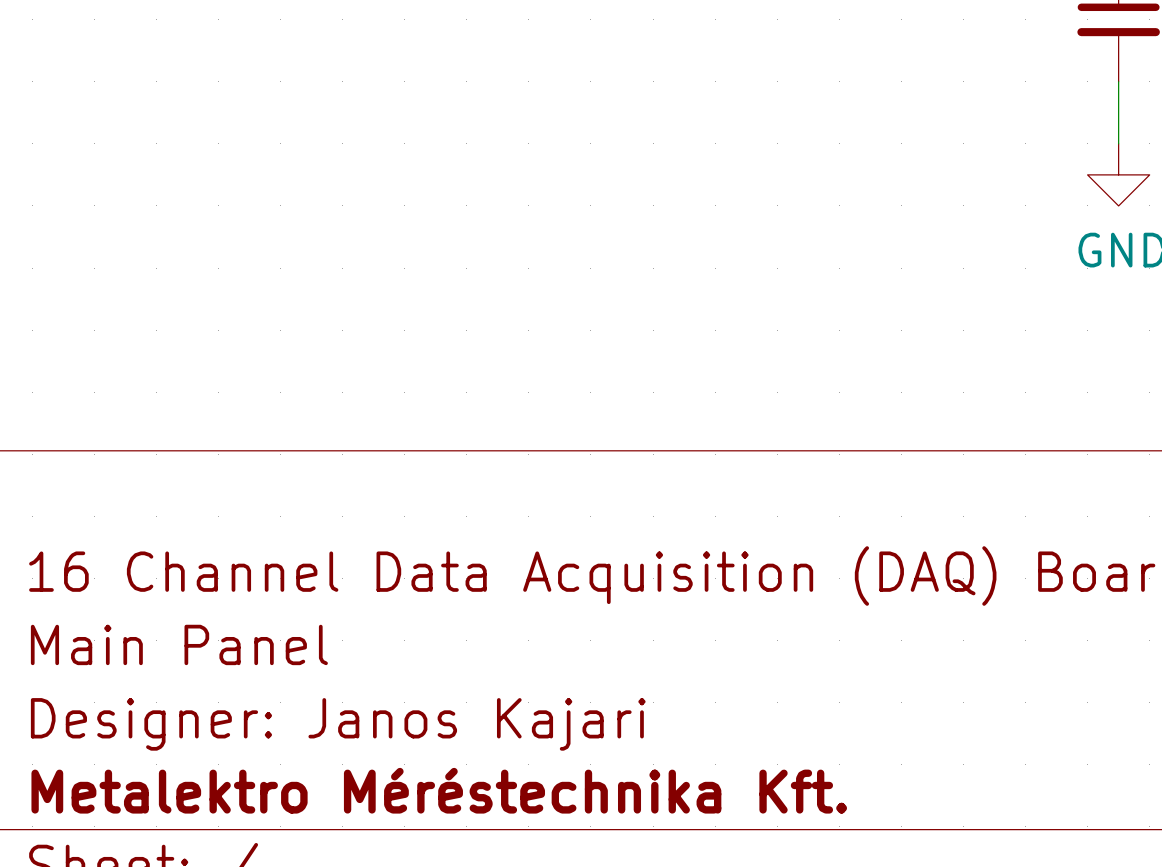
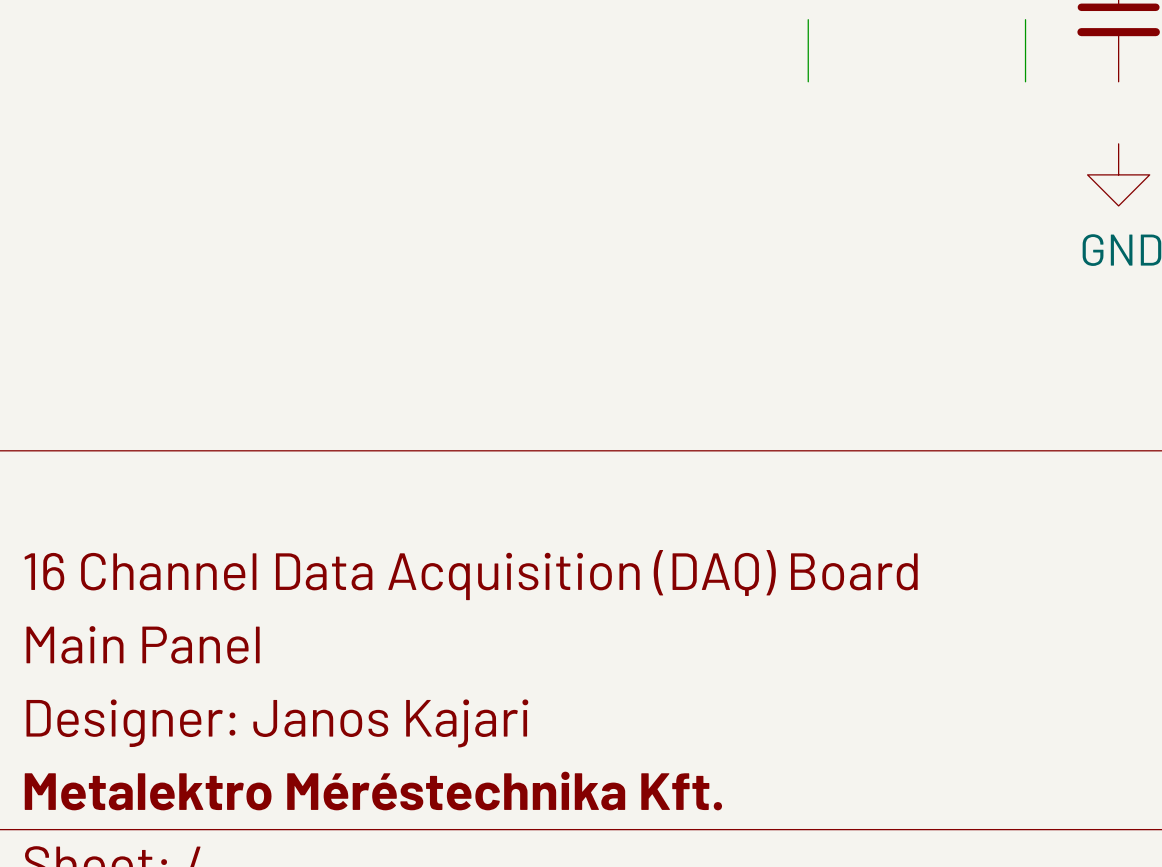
wire: none -> (808, 19) (808, 81)
wire: (1118, 81) (1118, 143) -> (1025, 19) (1025, 81)

